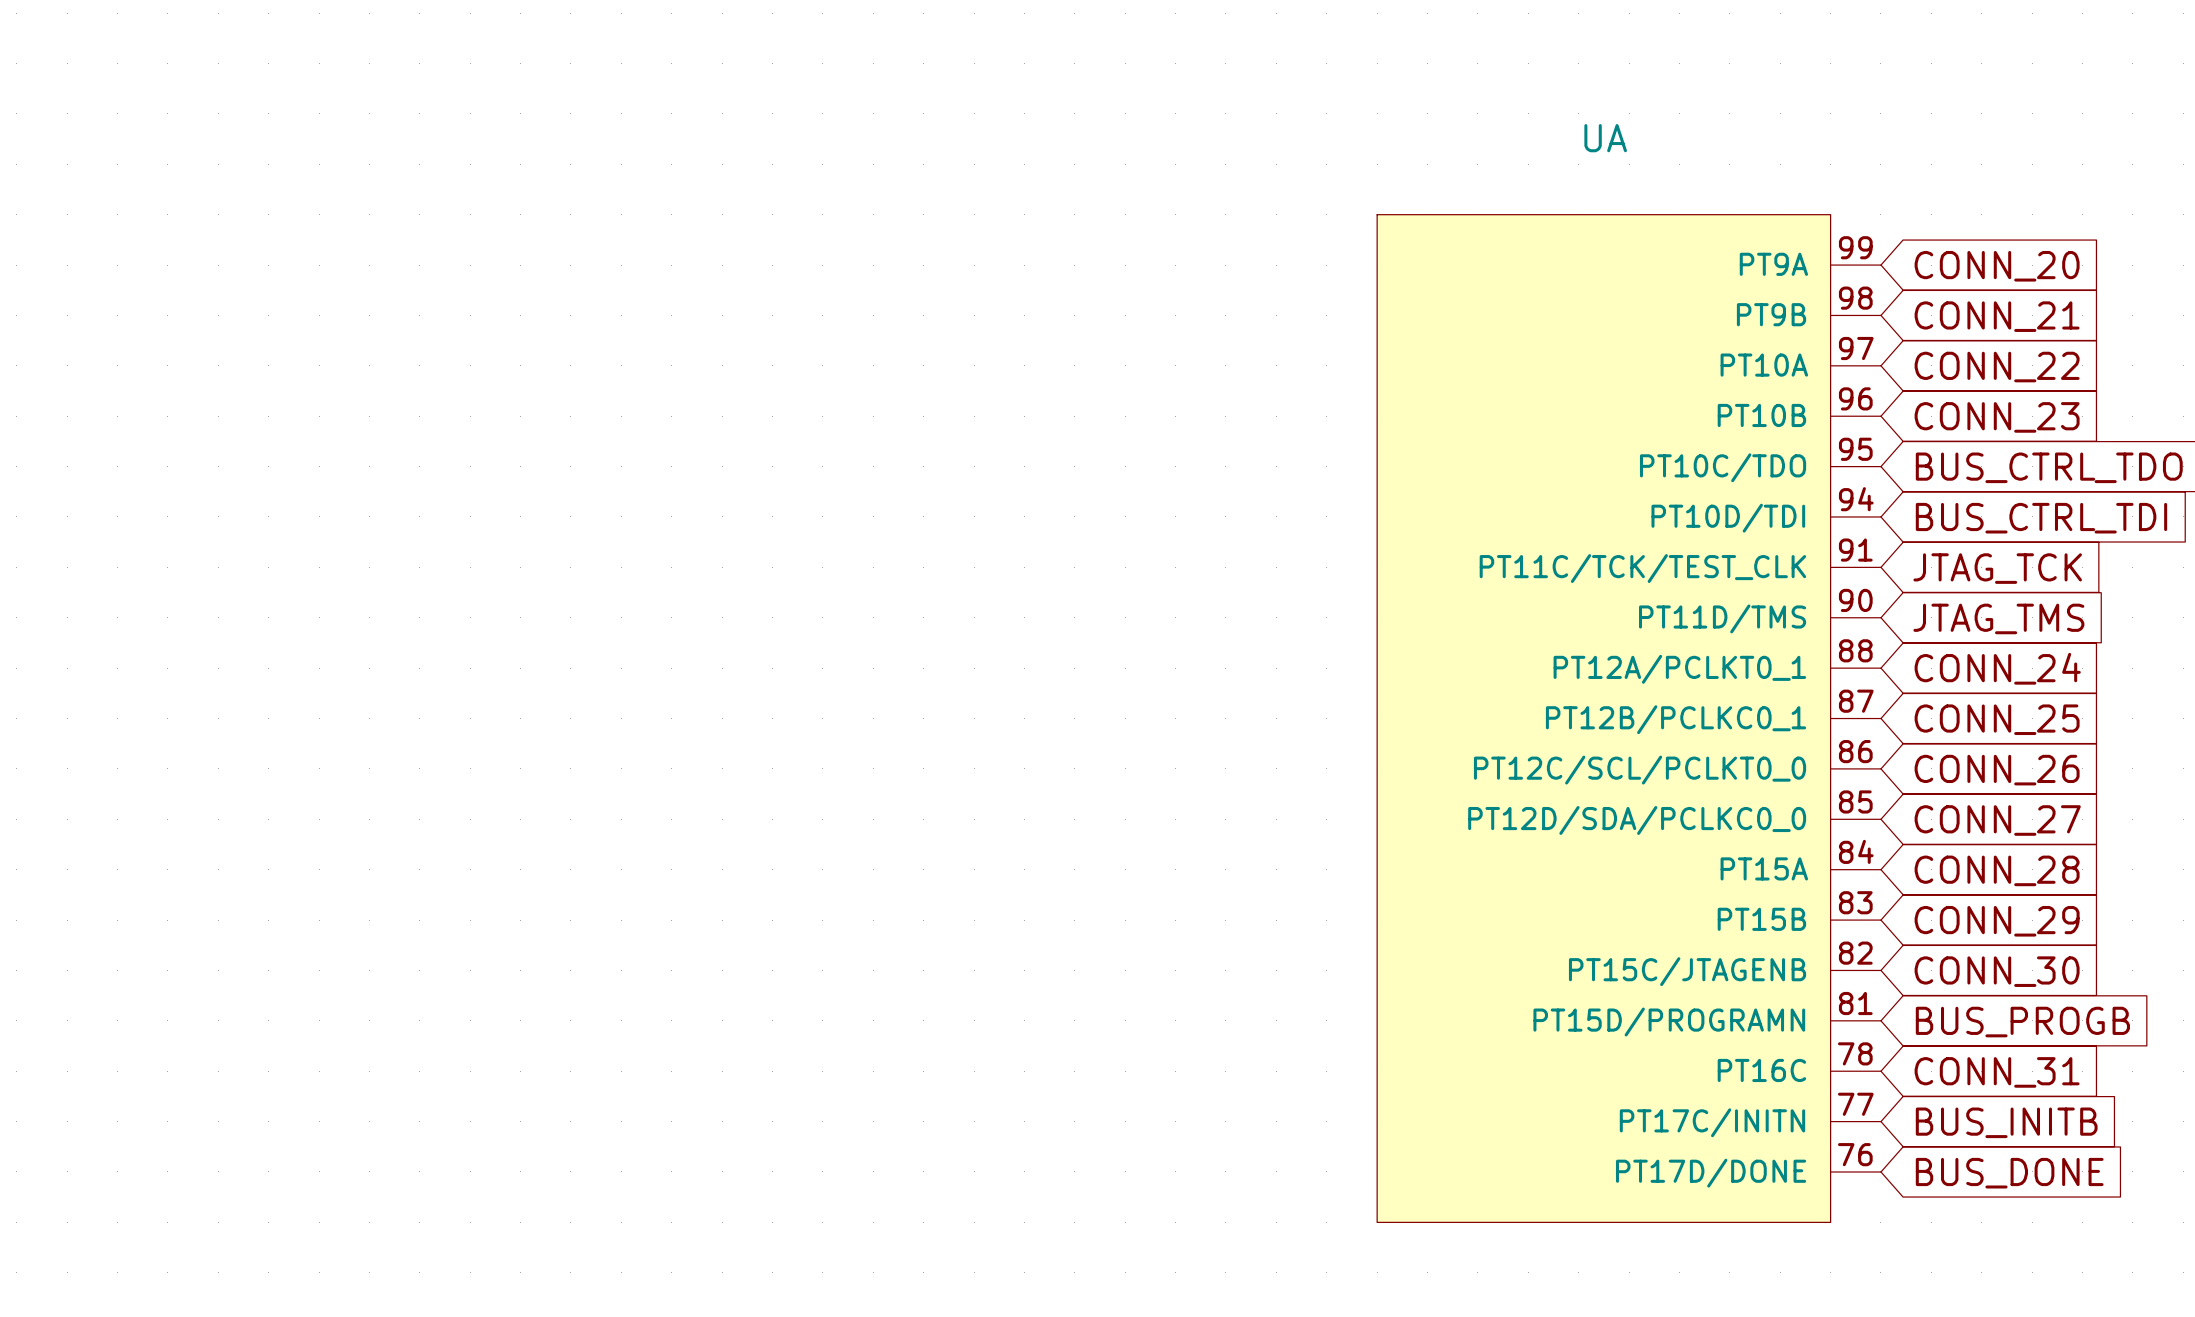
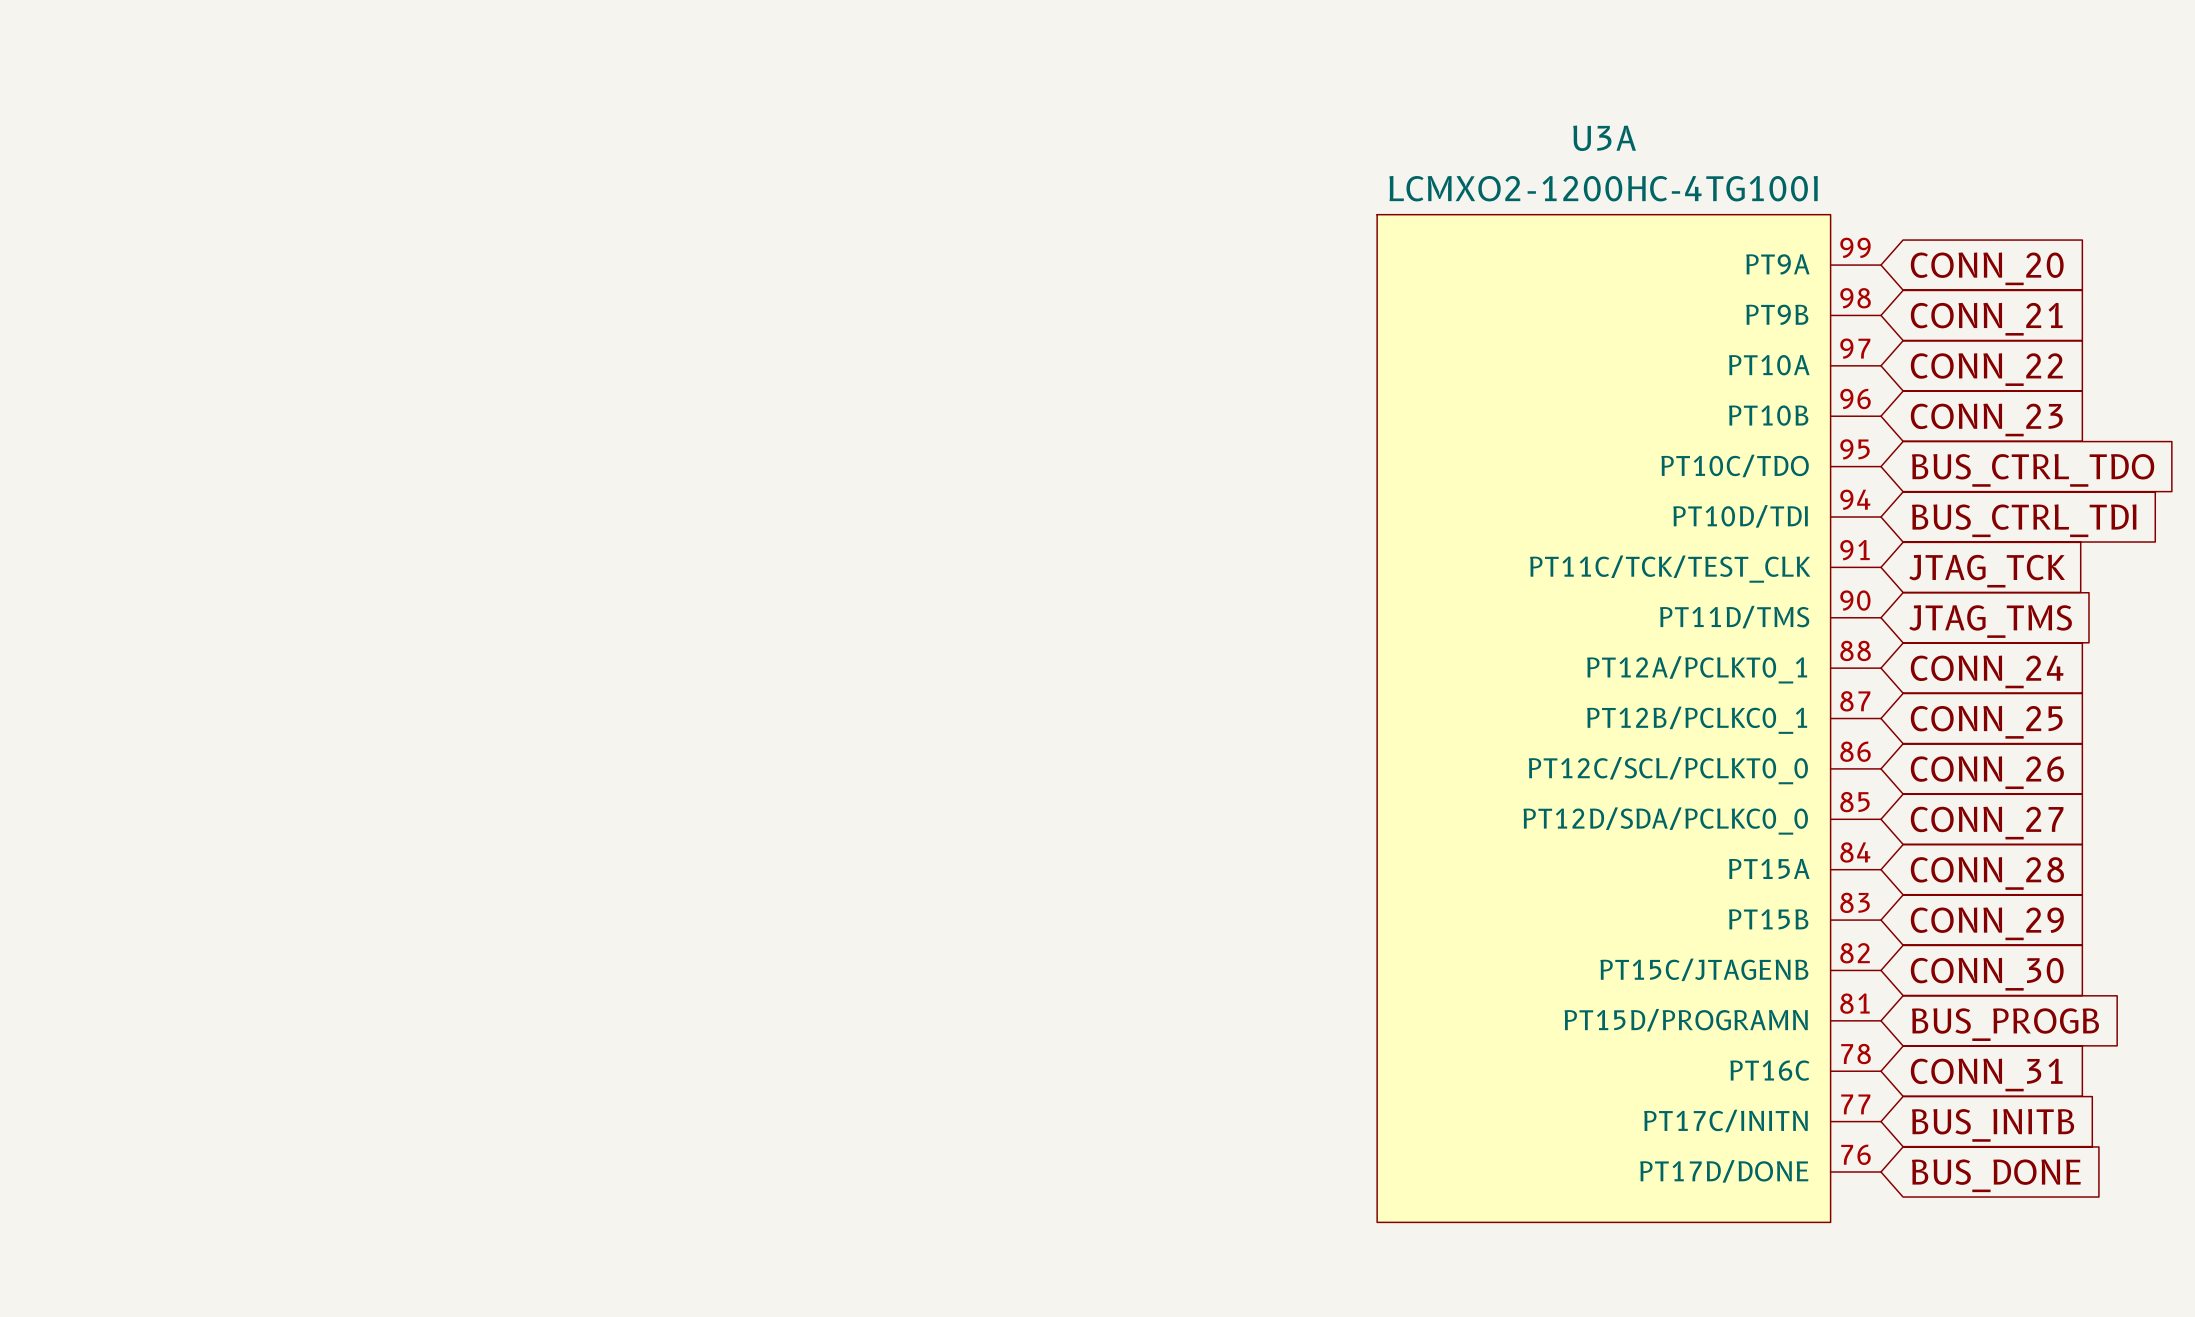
UA name: UA (1605, 138) -> U3A (1604, 138)
UA value: none -> LCMXO2-1200HC-4TG100I (1603, 188)

